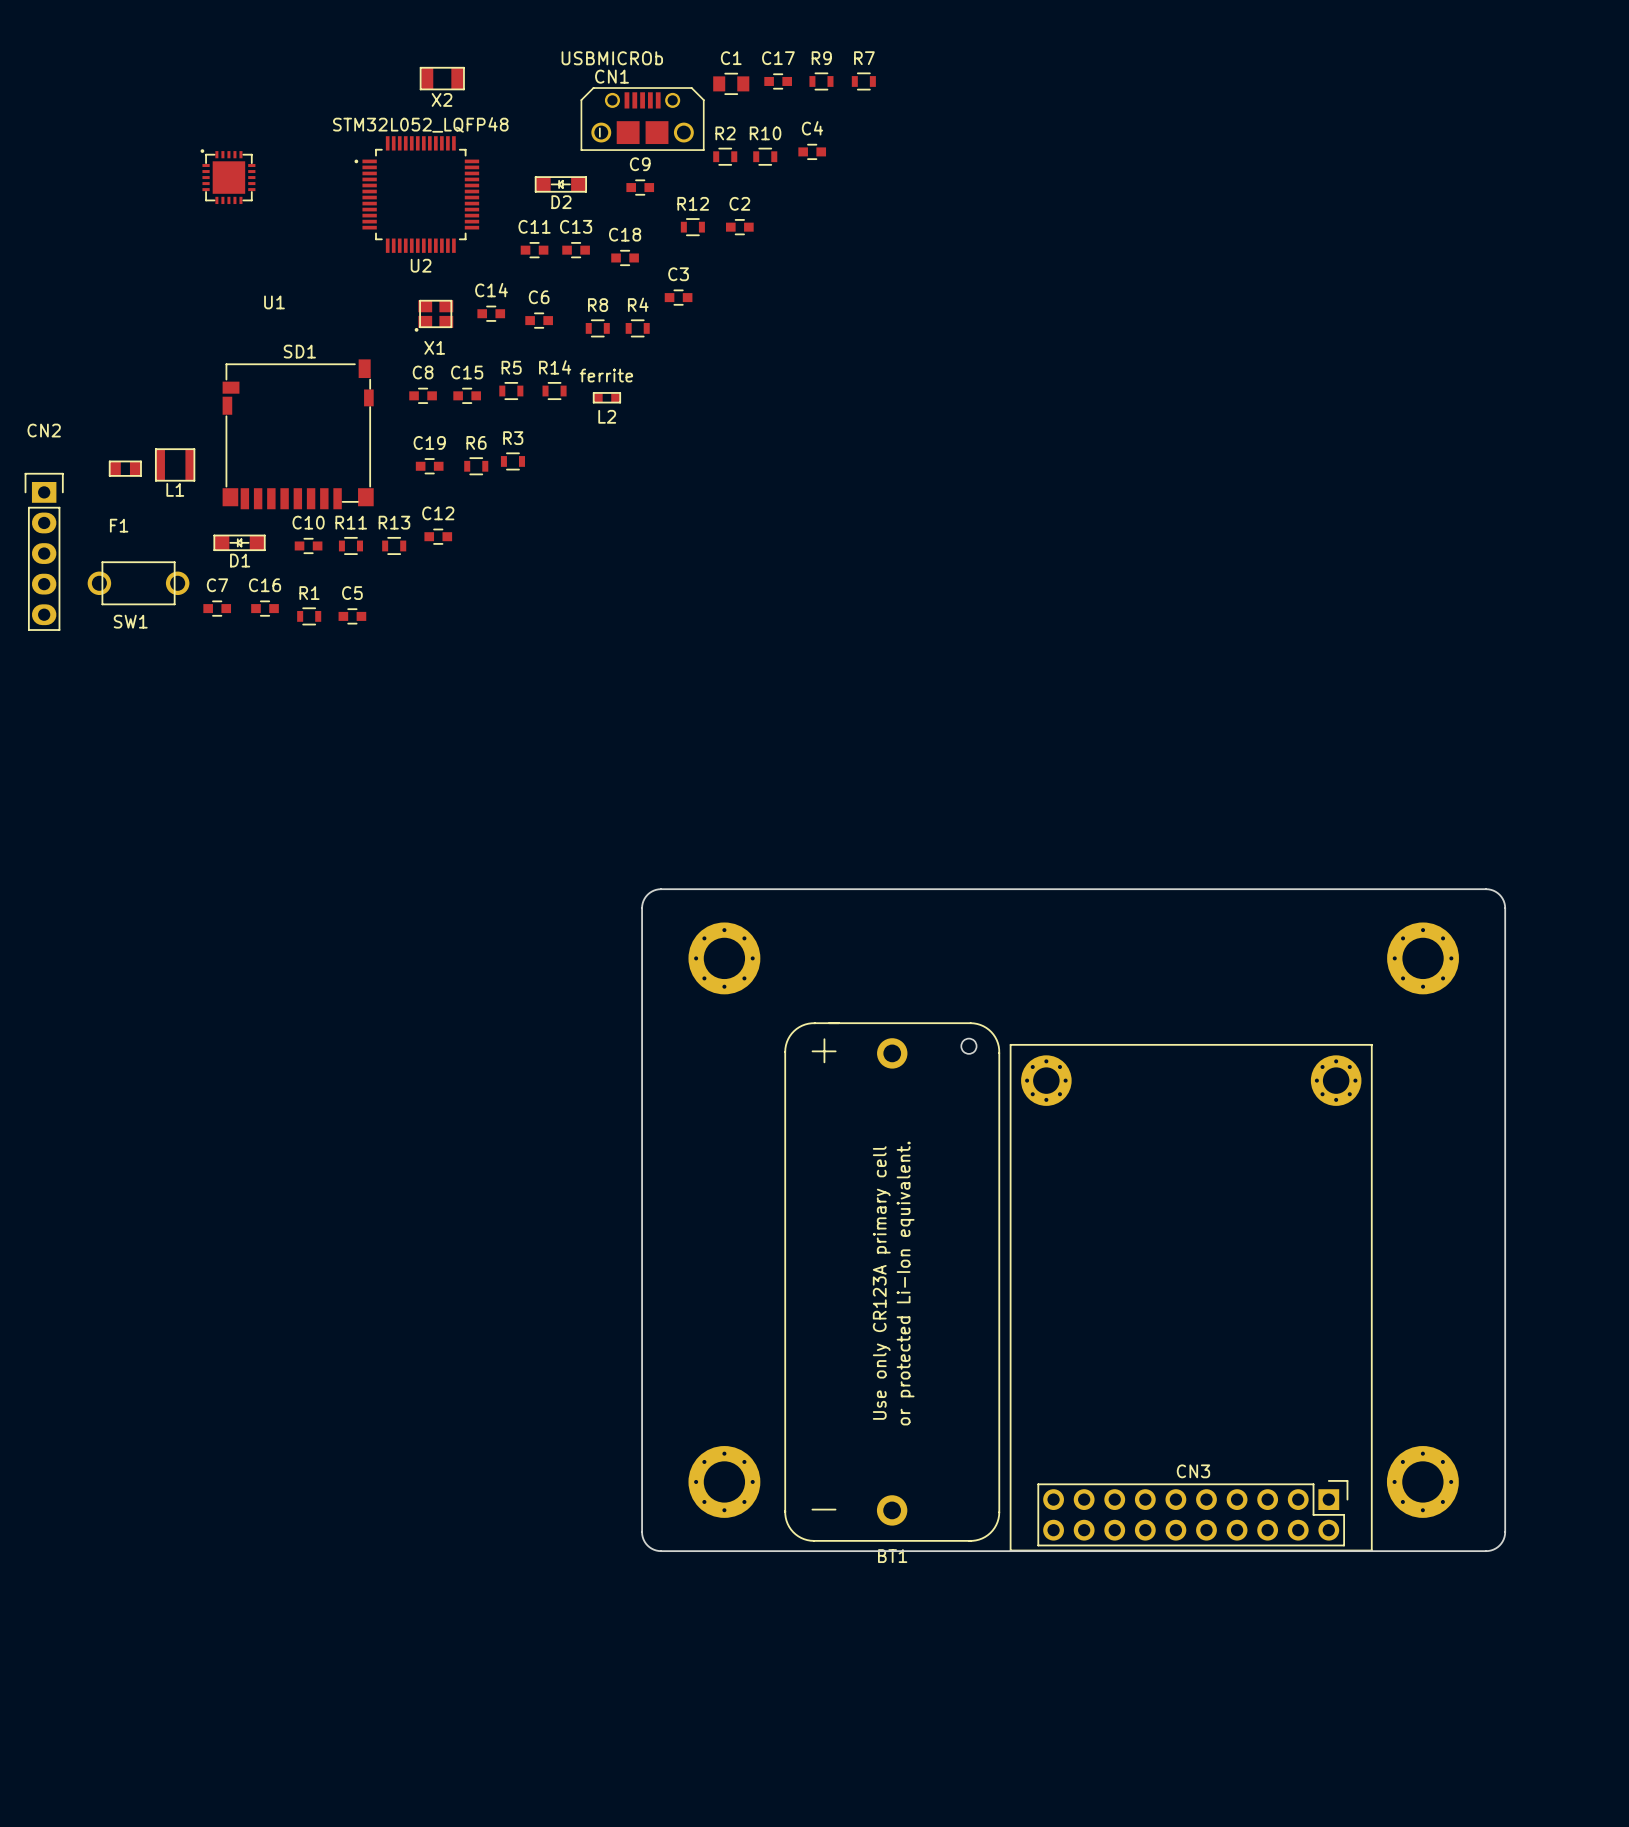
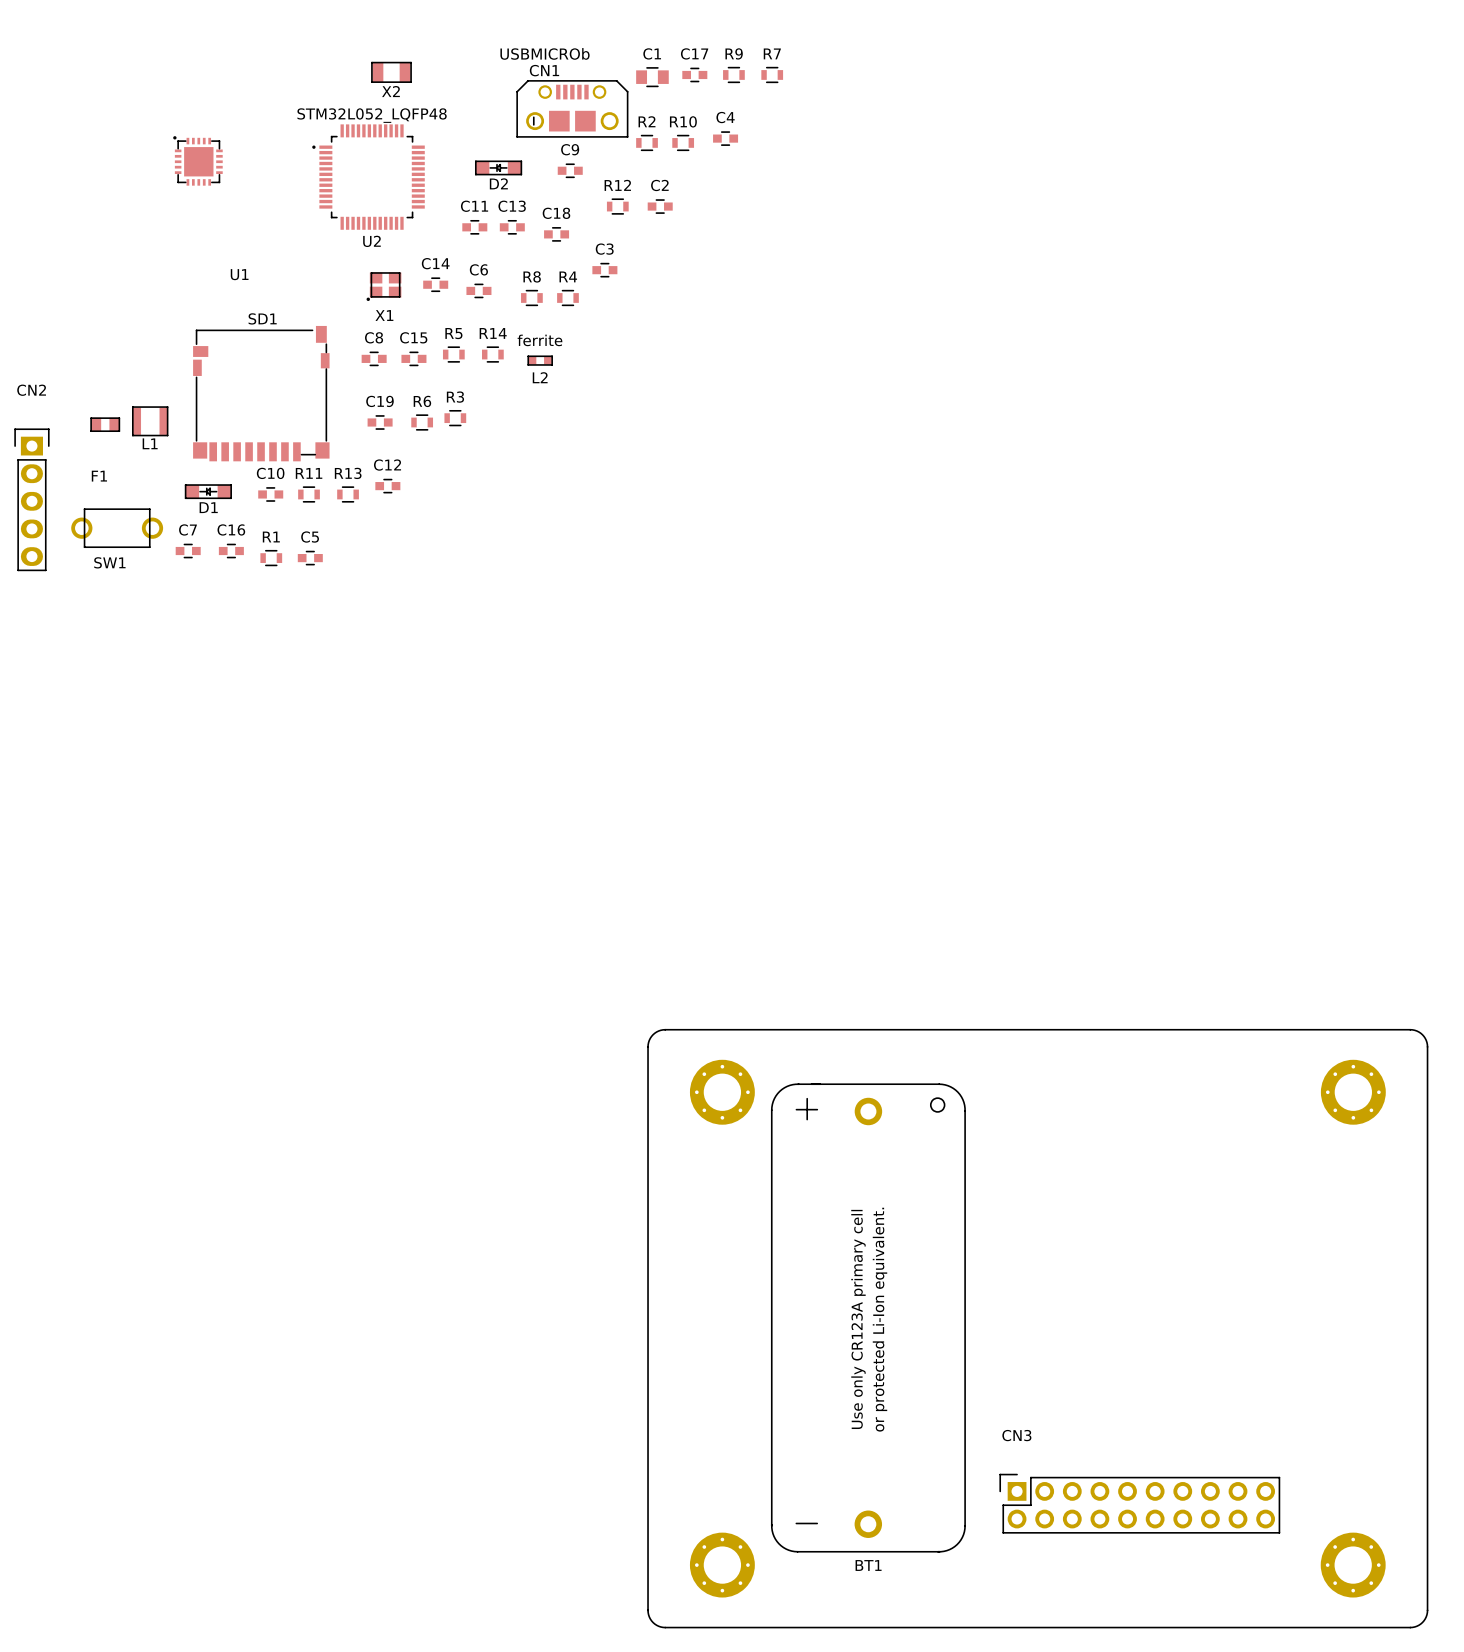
board edge: (1486, 889) (661, 889) (647, 894) (642, 908) -> (1410, 1029) (665, 1029) (653, 1034) (648, 1046)
board edge: (1486, 889) (1499, 894) (1505, 908) (1505, 1532) (1503, 1539) (1497, 1547) (1486, 1551) (661, 1551) -> (1410, 1029) (1422, 1034) (1427, 1046) (1427, 1610) (1426, 1616) (1420, 1624) (1410, 1627) (665, 1627)
board edge: (642, 908) (642, 1532) (647, 1545) (661, 1551) -> (648, 1047) (648, 1610) (653, 1622) (665, 1627)
part: (724, 958) -> none
part: (1423, 958) -> none
CN3 footprint: [1009, 1043, 1373, 1552] -> [999, 1473, 1281, 1534]
part: none -> (722, 1092)
part: none -> (1353, 1092)
BT1 position: (892, 1282) -> (868, 1317)
CN3 name position: CN3 (1193, 1471) -> CN3 (1016, 1435)
part: (724, 1481) -> none
part: (1422, 1481) -> none
part: none -> (722, 1565)
part: none -> (1353, 1565)

